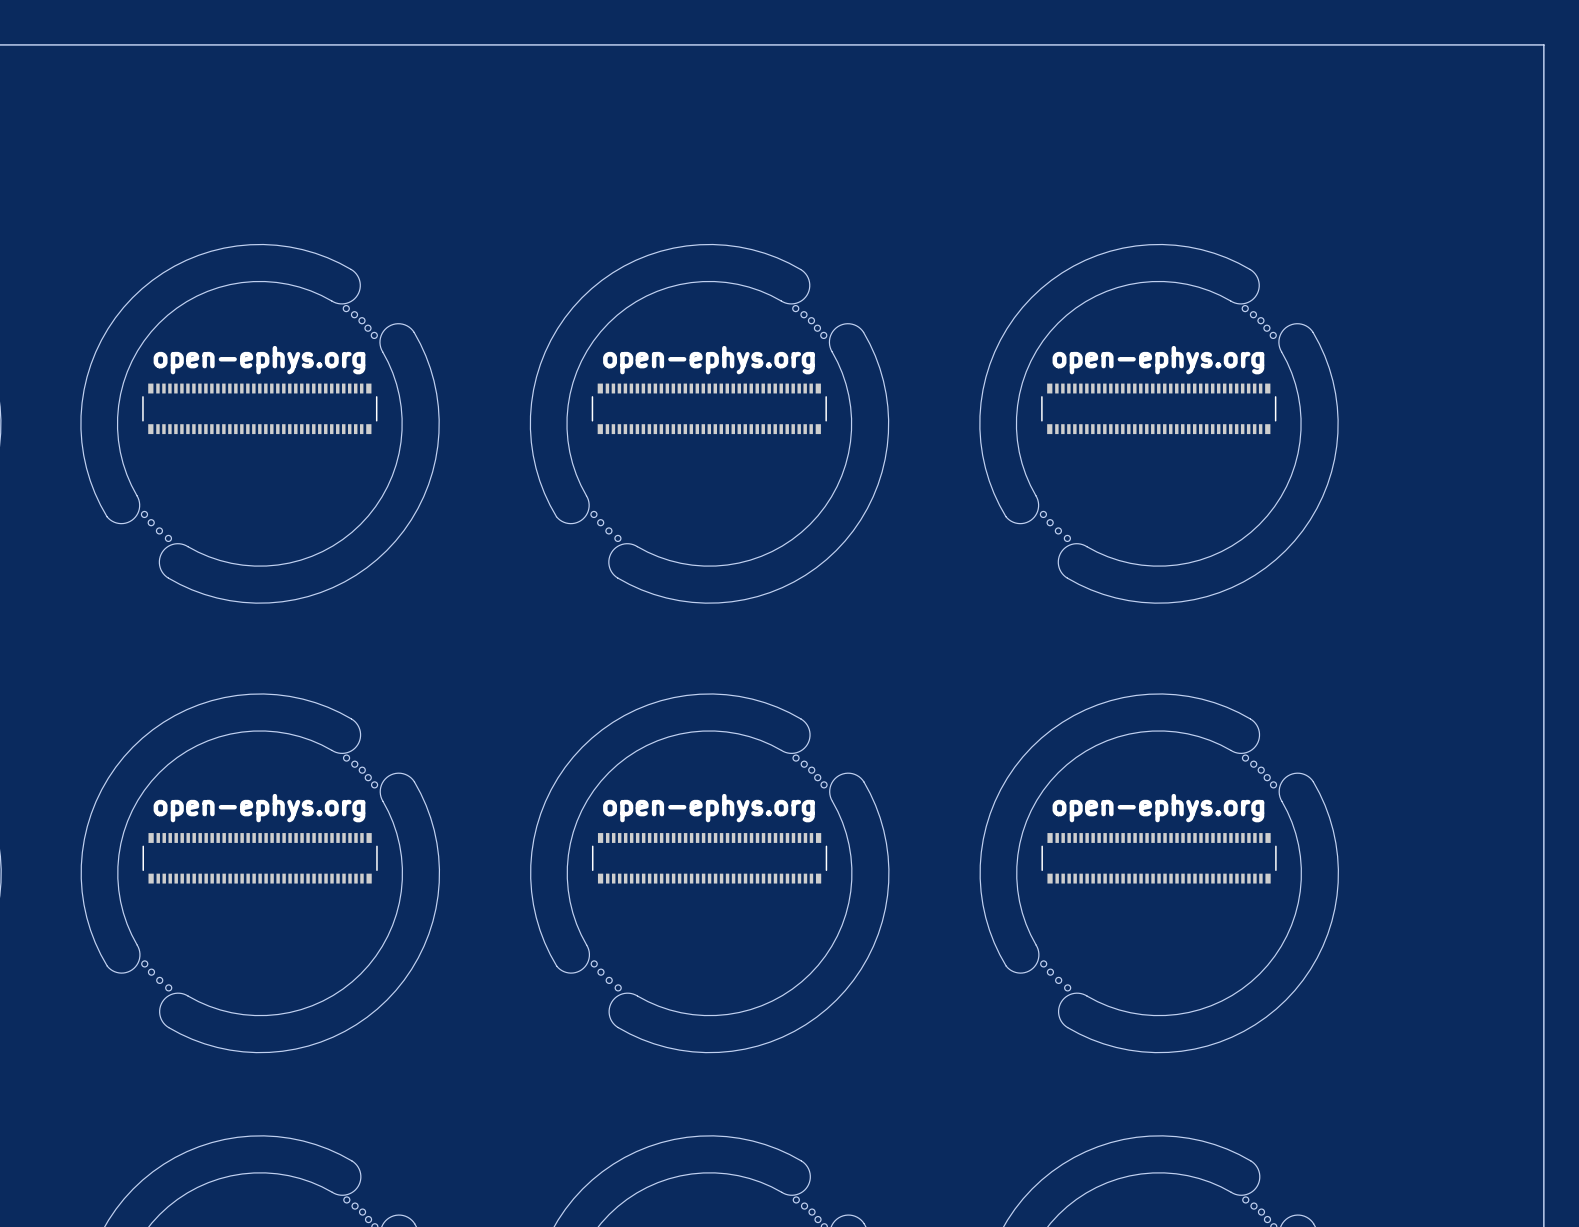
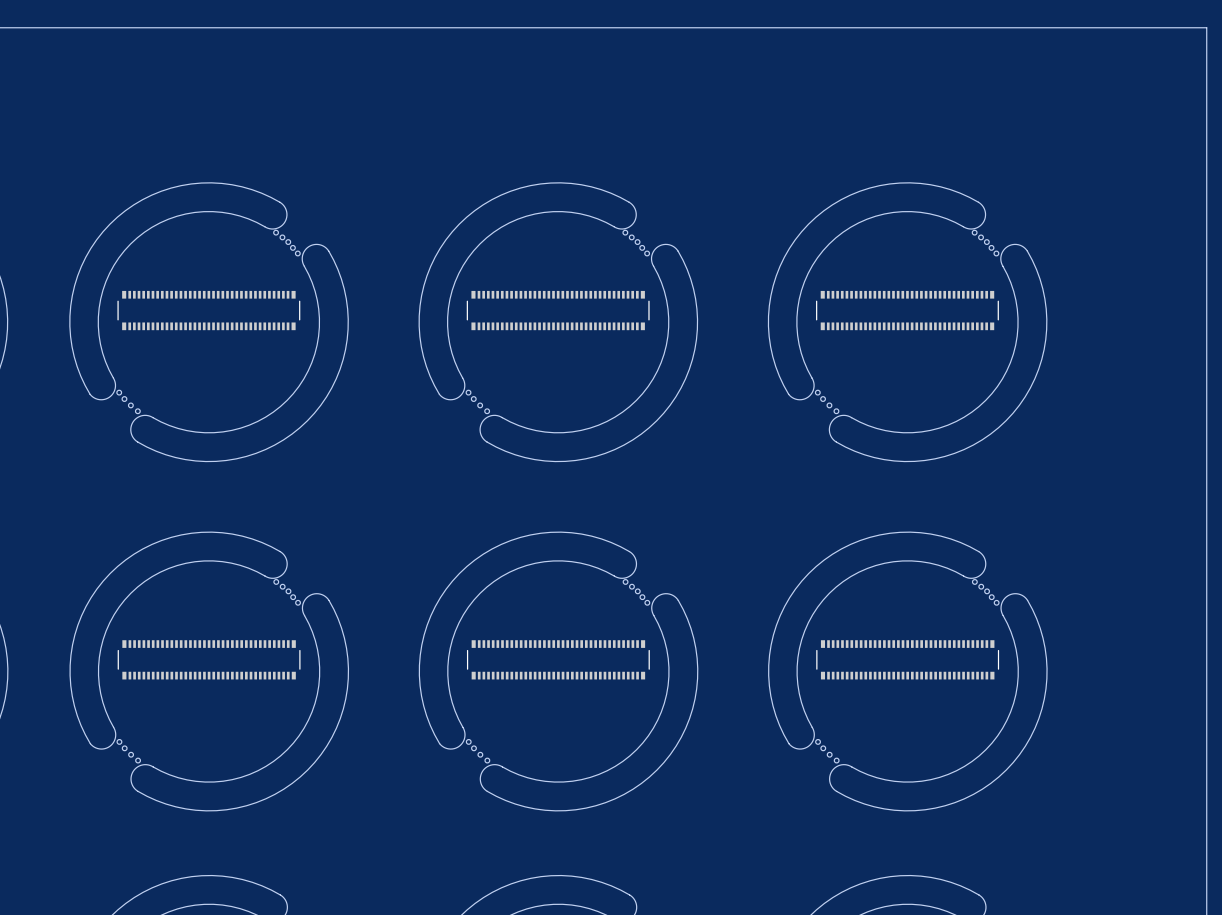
text: open-ephys.org (259, 360) -> none
text: open-ephys.org (708, 360) -> none
text: open-ephys.org (1158, 360) -> none
text: open-ephys.org (259, 808) -> none
text: open-ephys.org (708, 808) -> none
text: open-ephys.org (1158, 808) -> none

